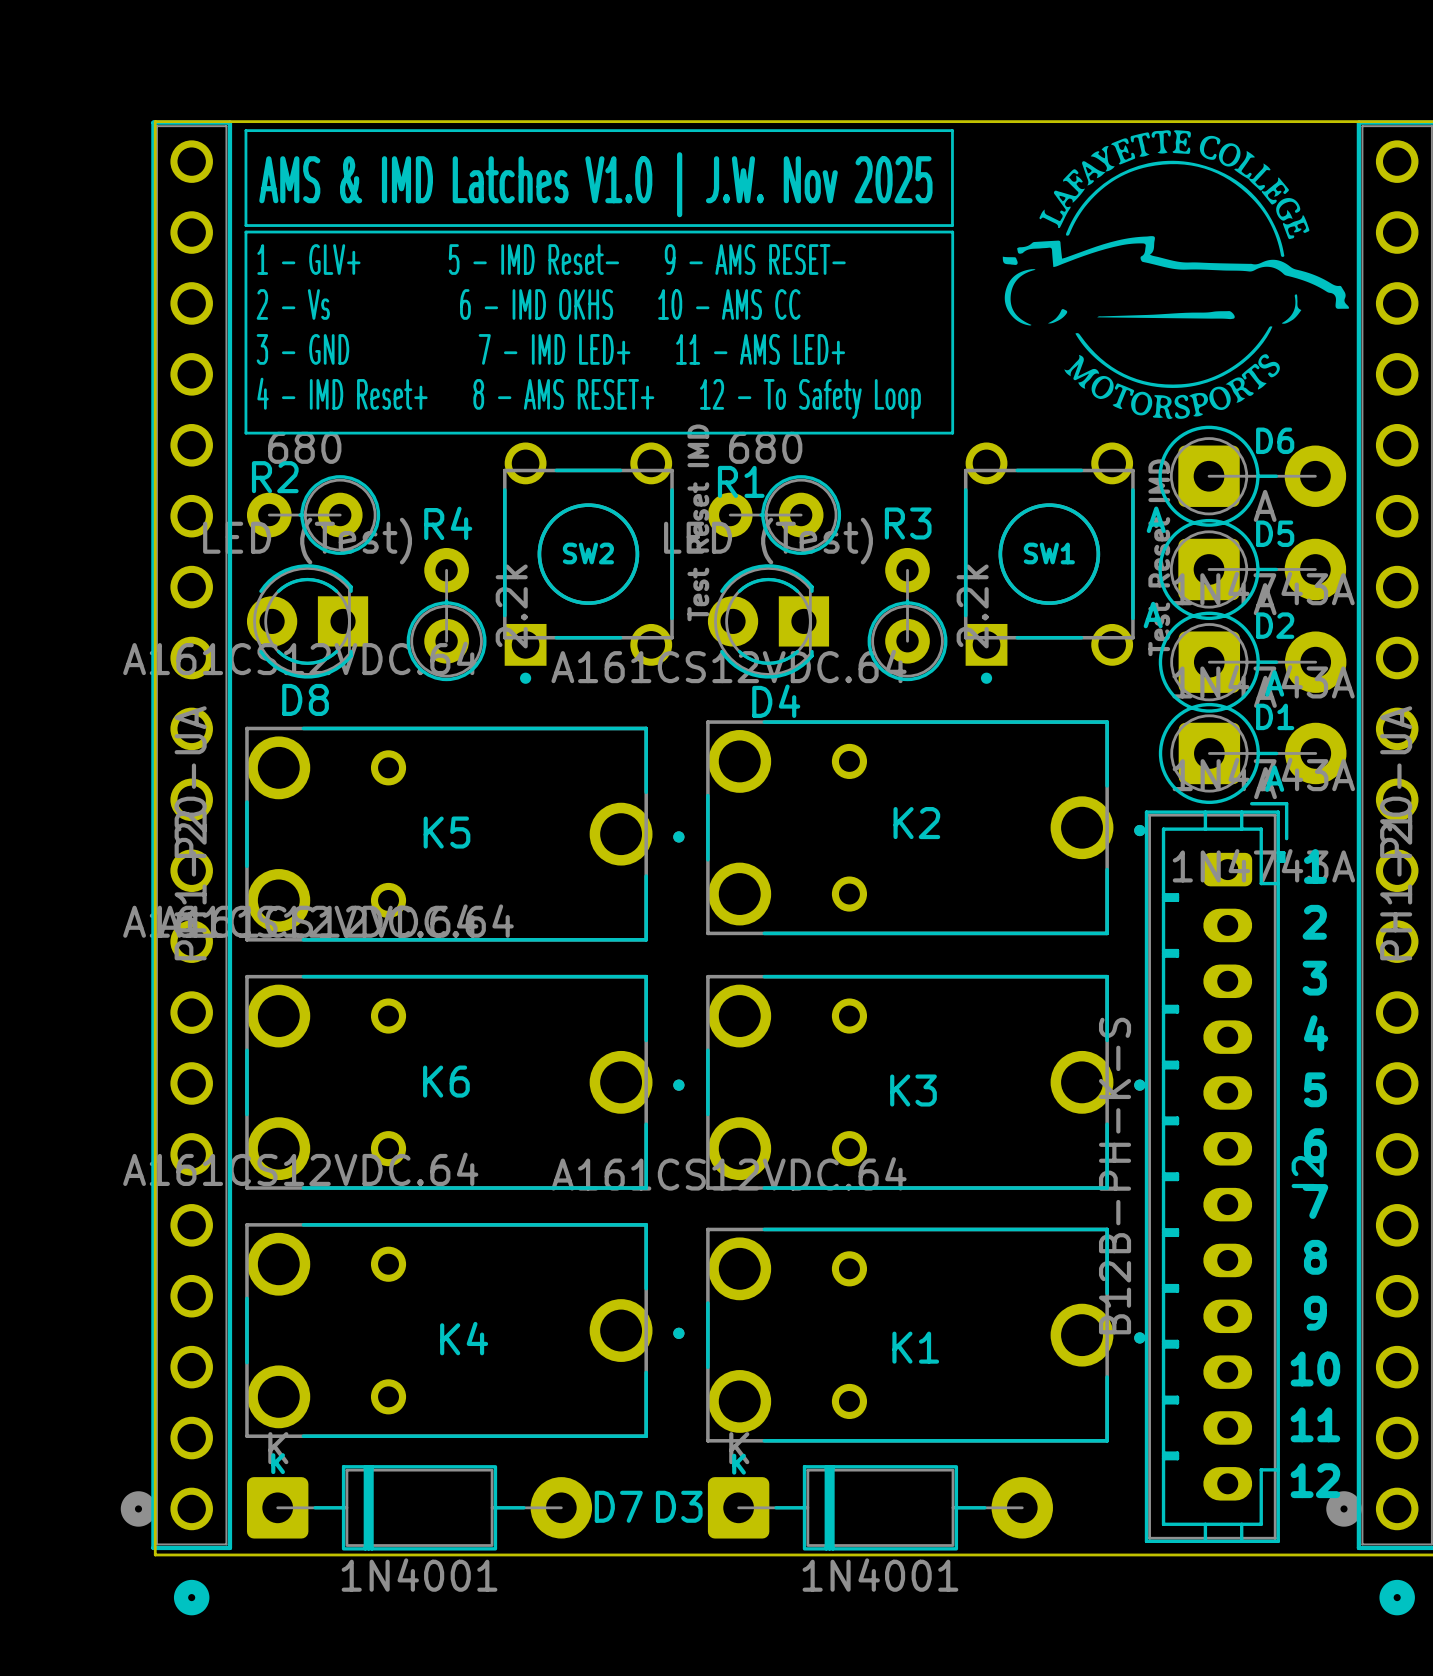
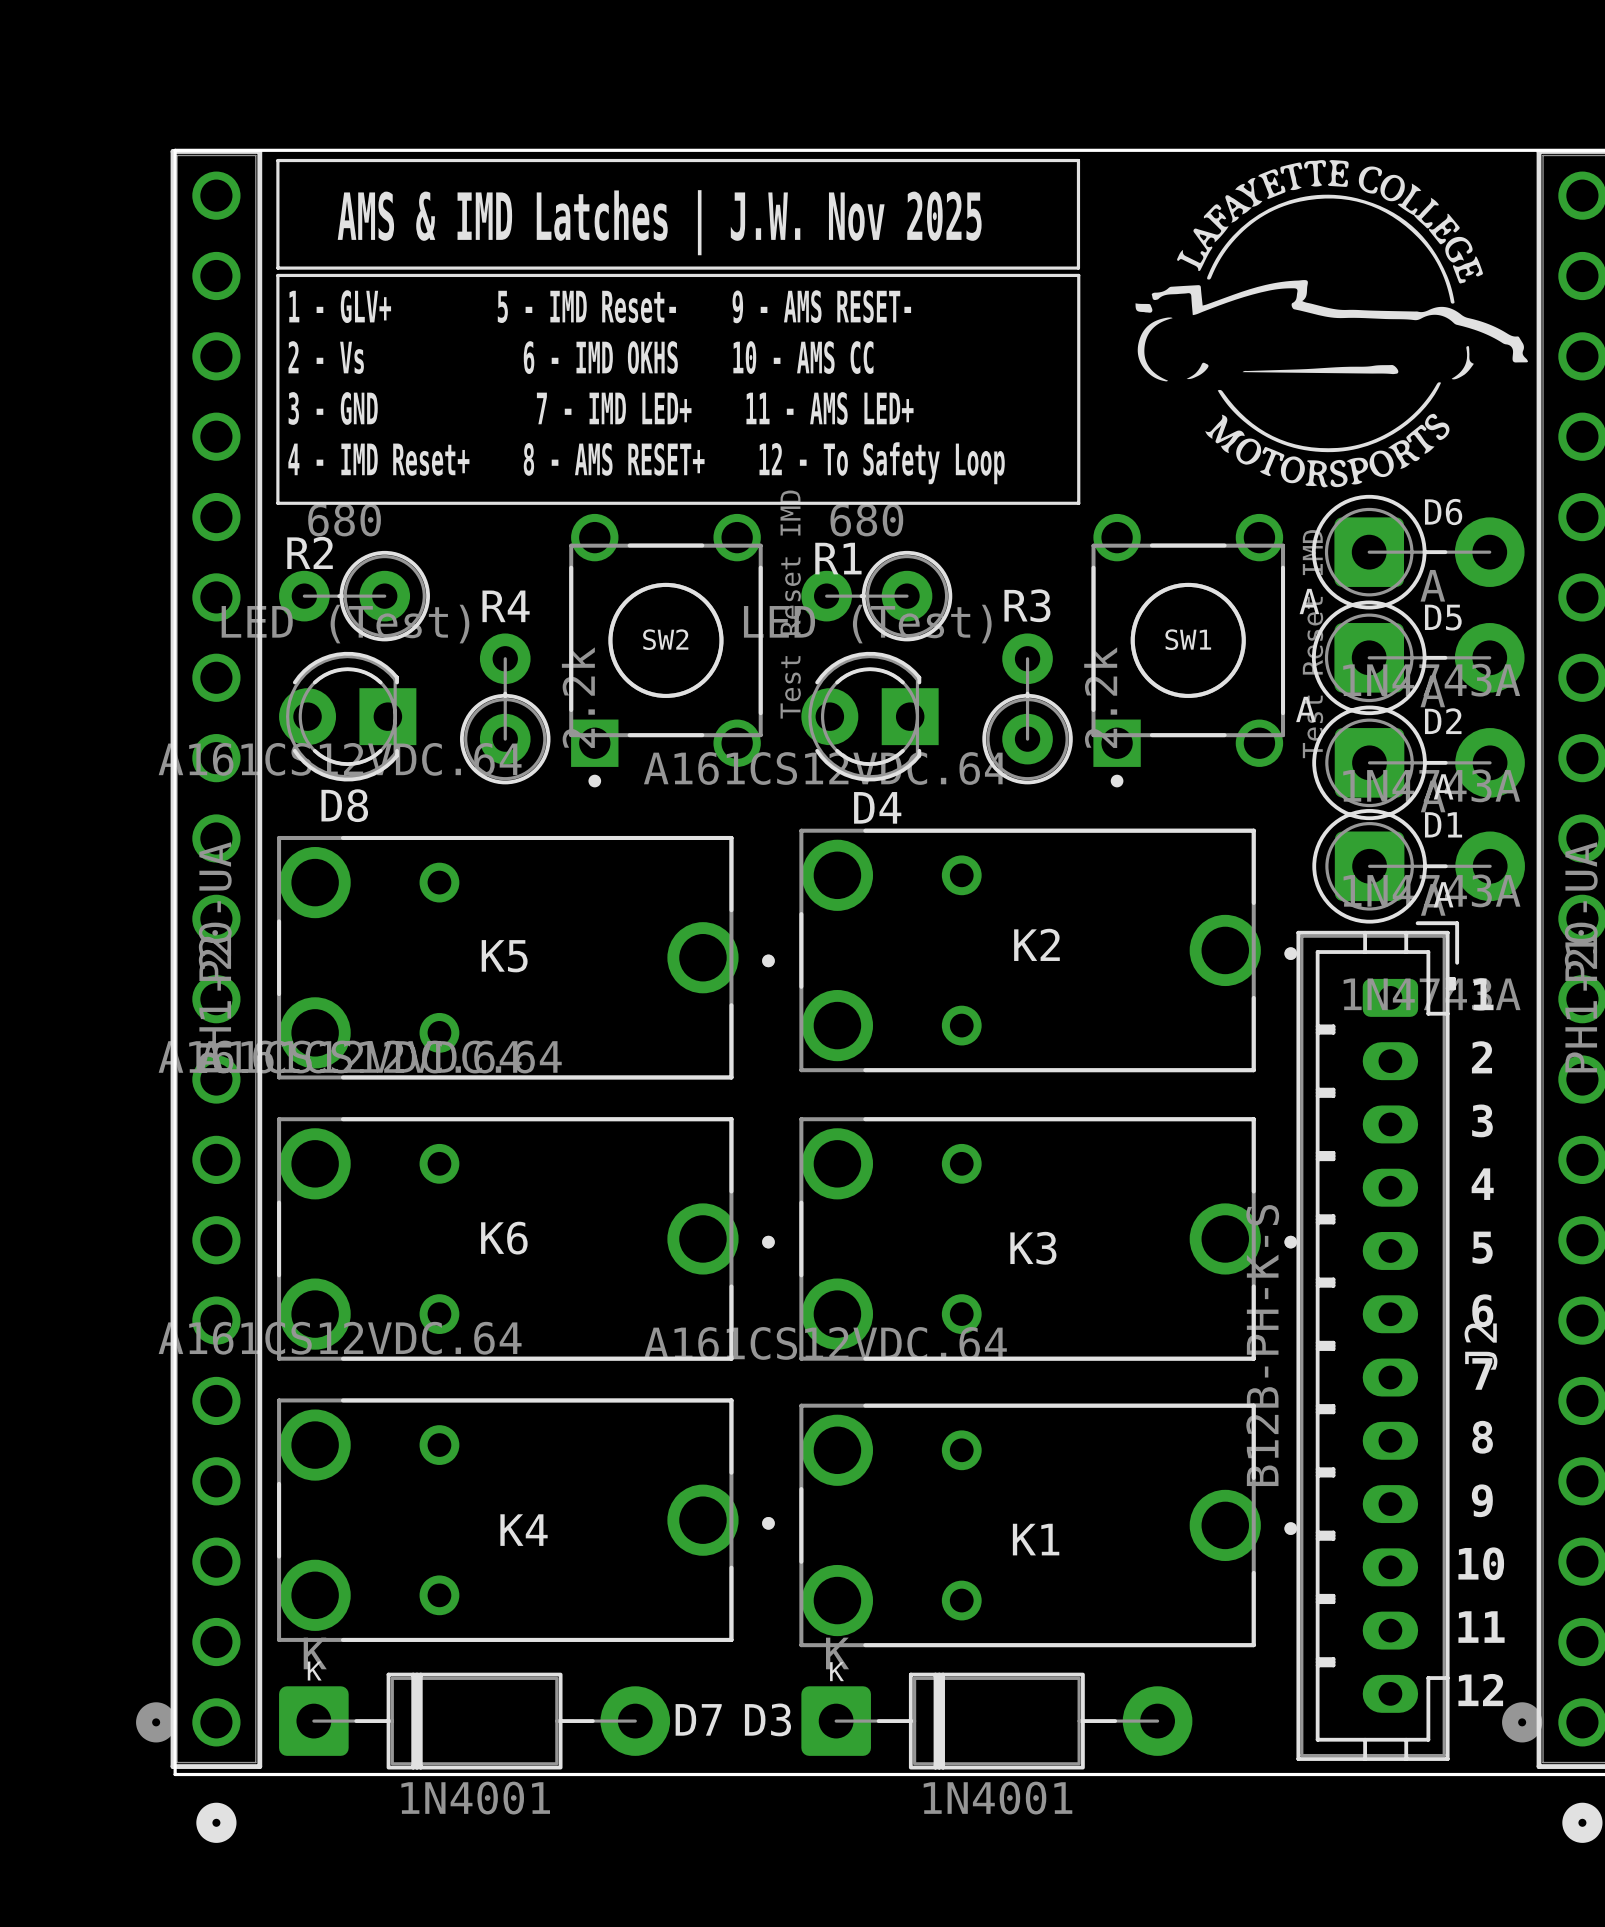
text: AMS & IMD Latches V1.0 | J.W. Nov 2025 (595, 184) -> AMS & IMD Latches | J.W. Nov 2025 (659, 222)

